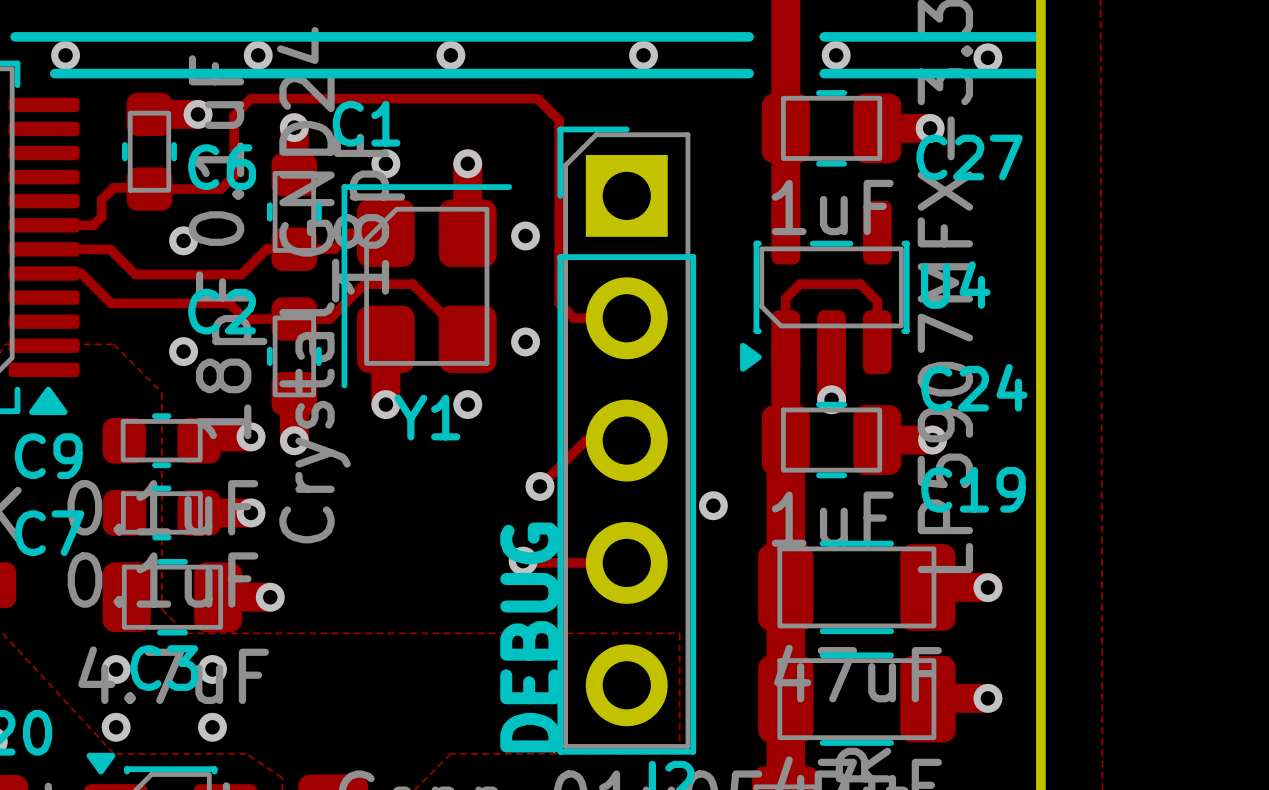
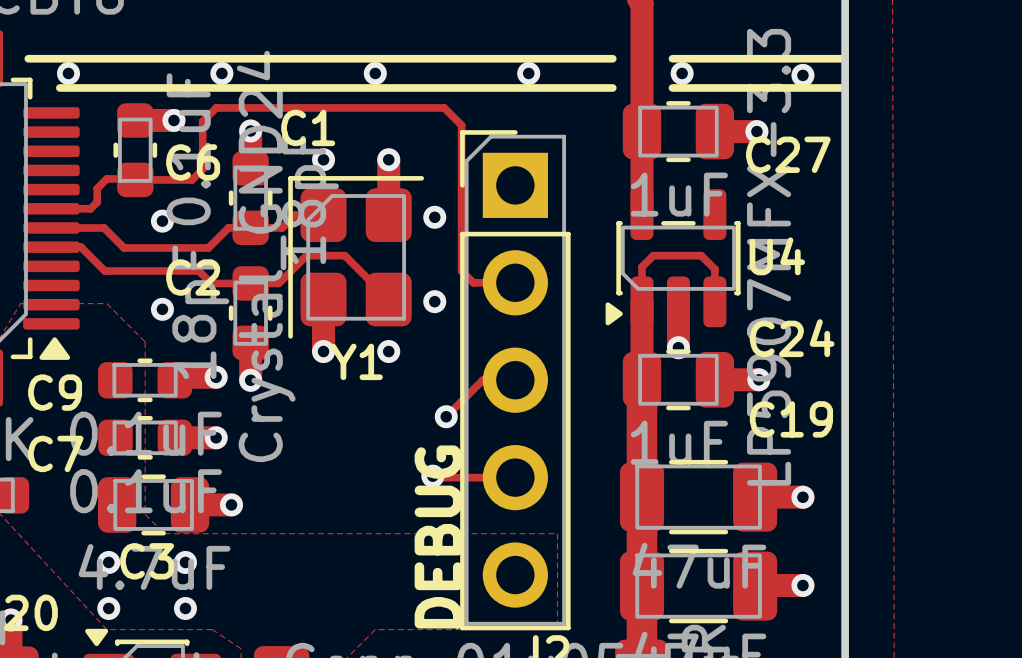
via: (713, 505) -> none

